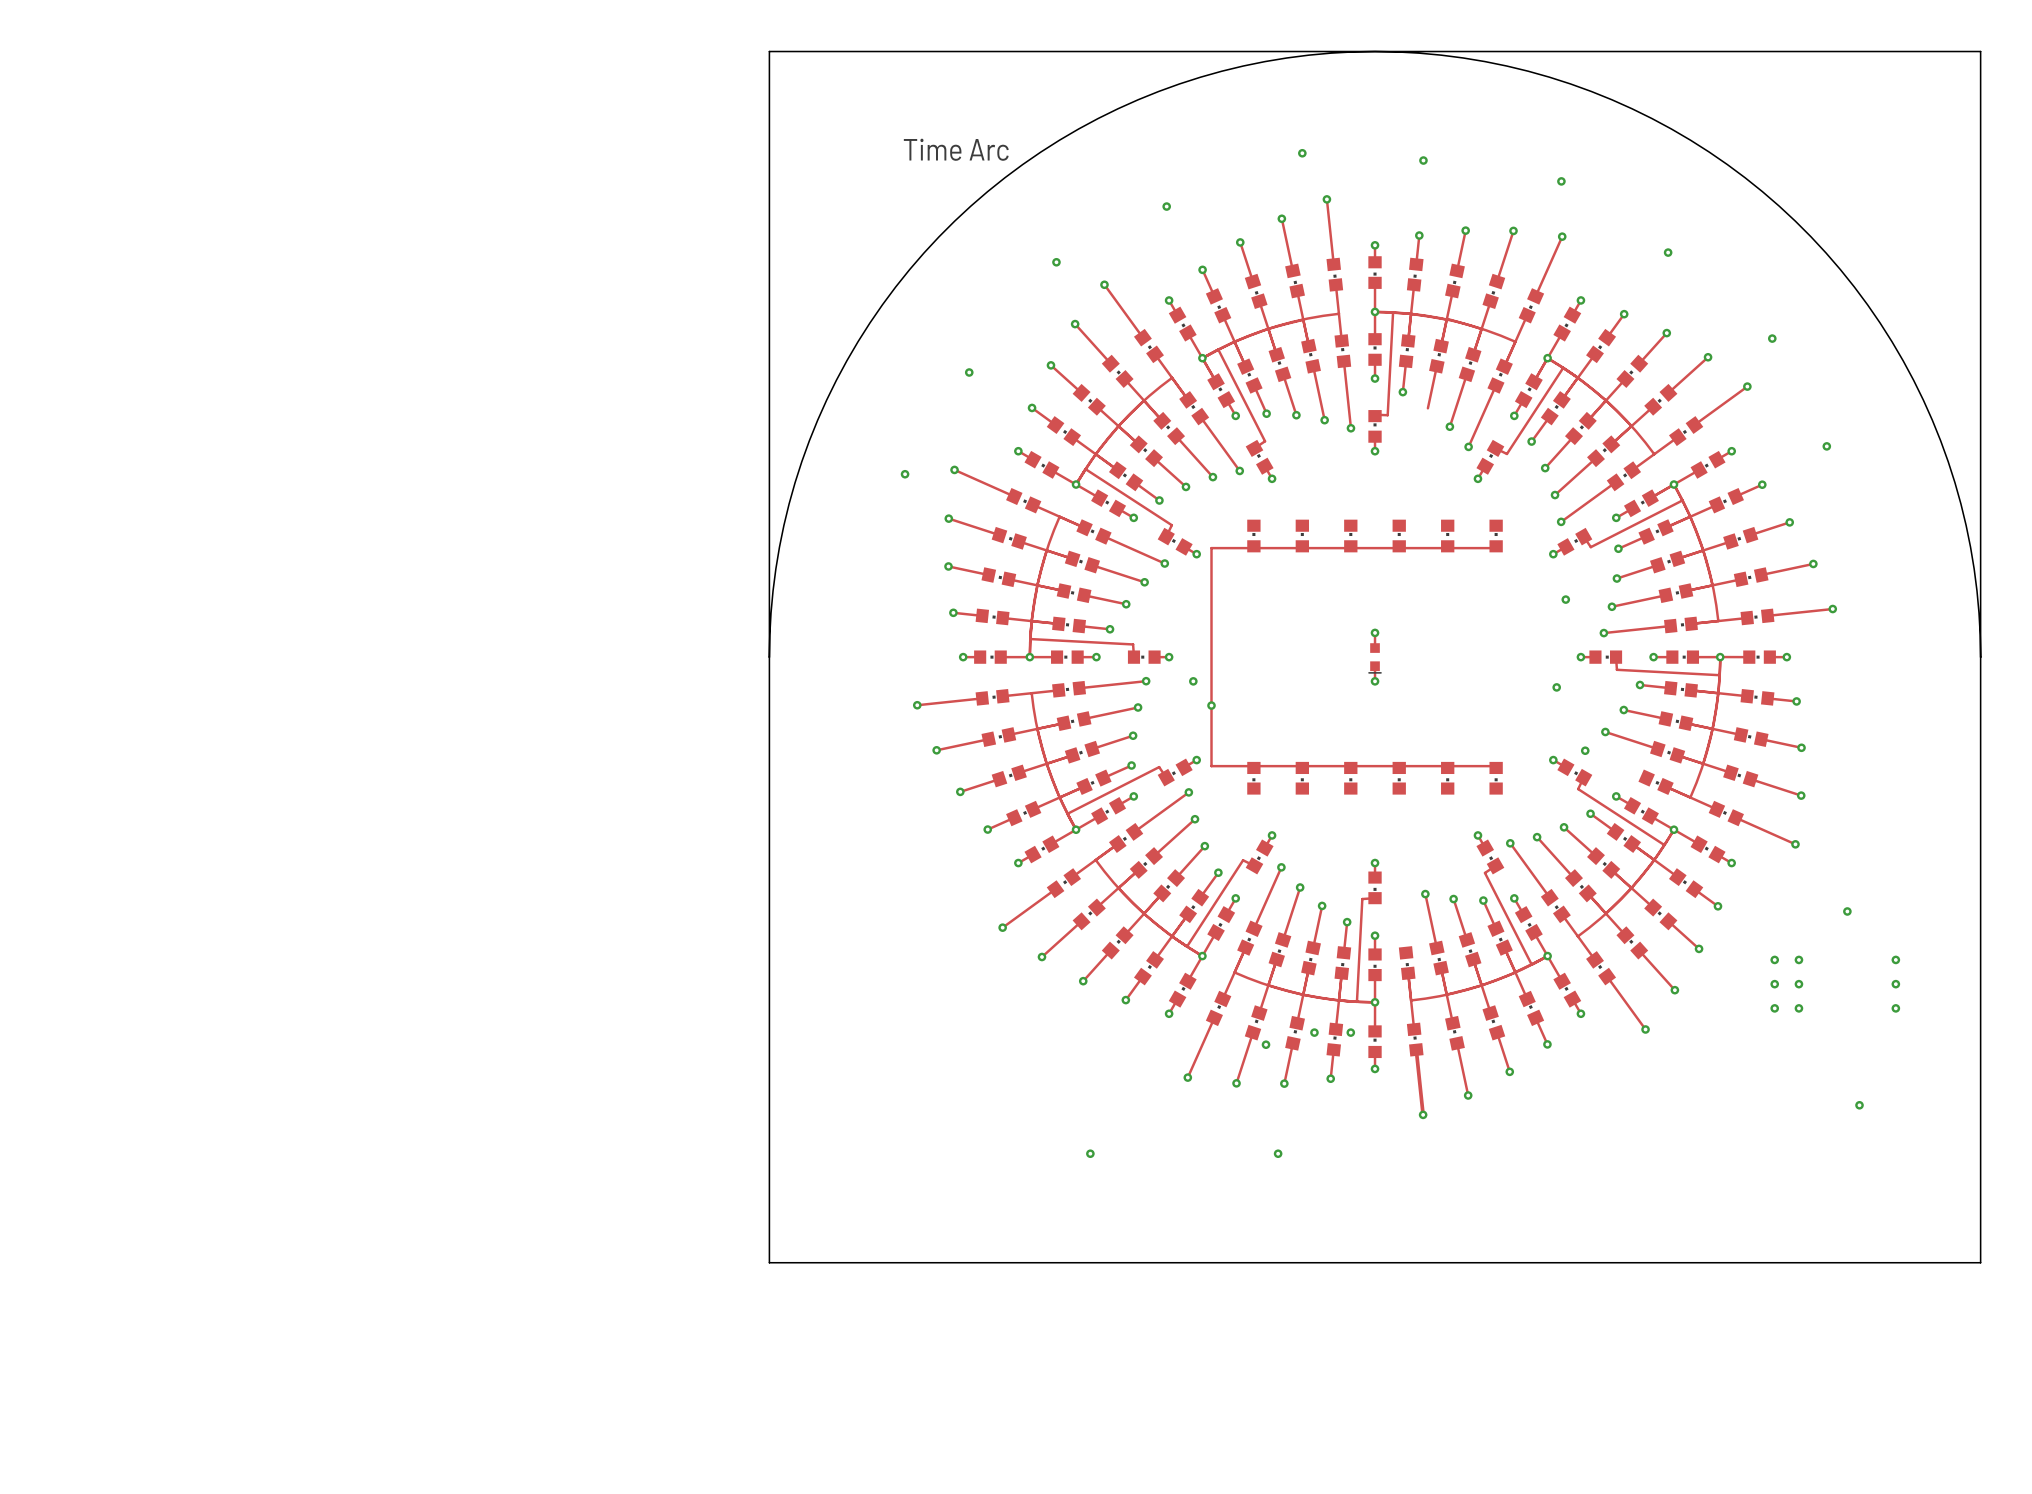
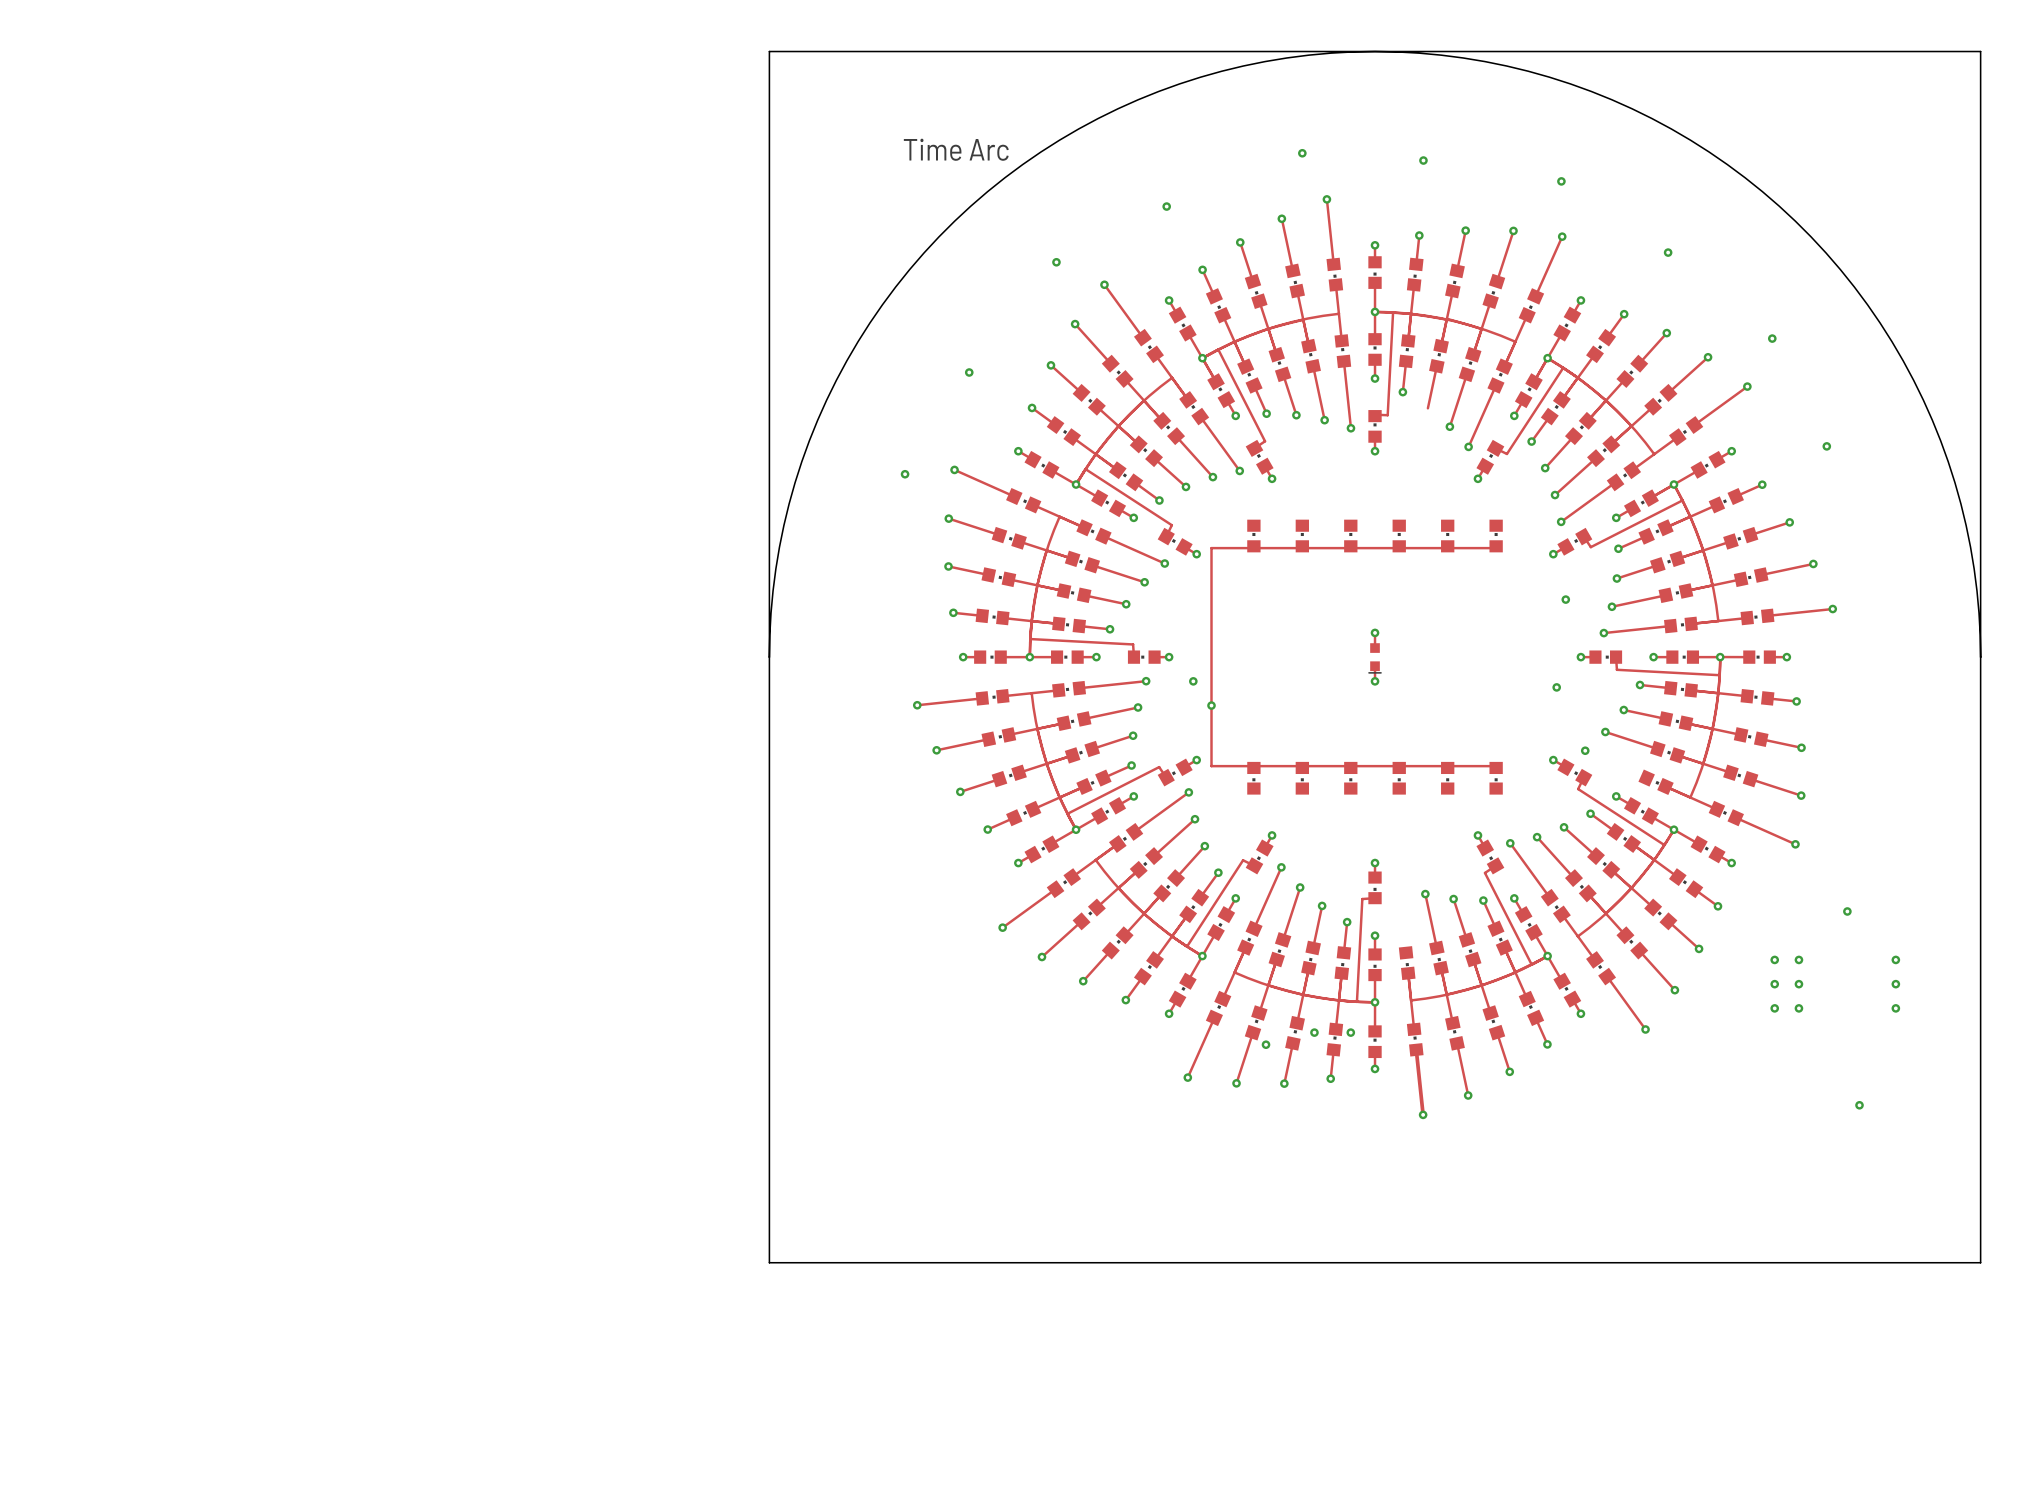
via: (1090, 1153) -> none
via: (1278, 1153) -> none

